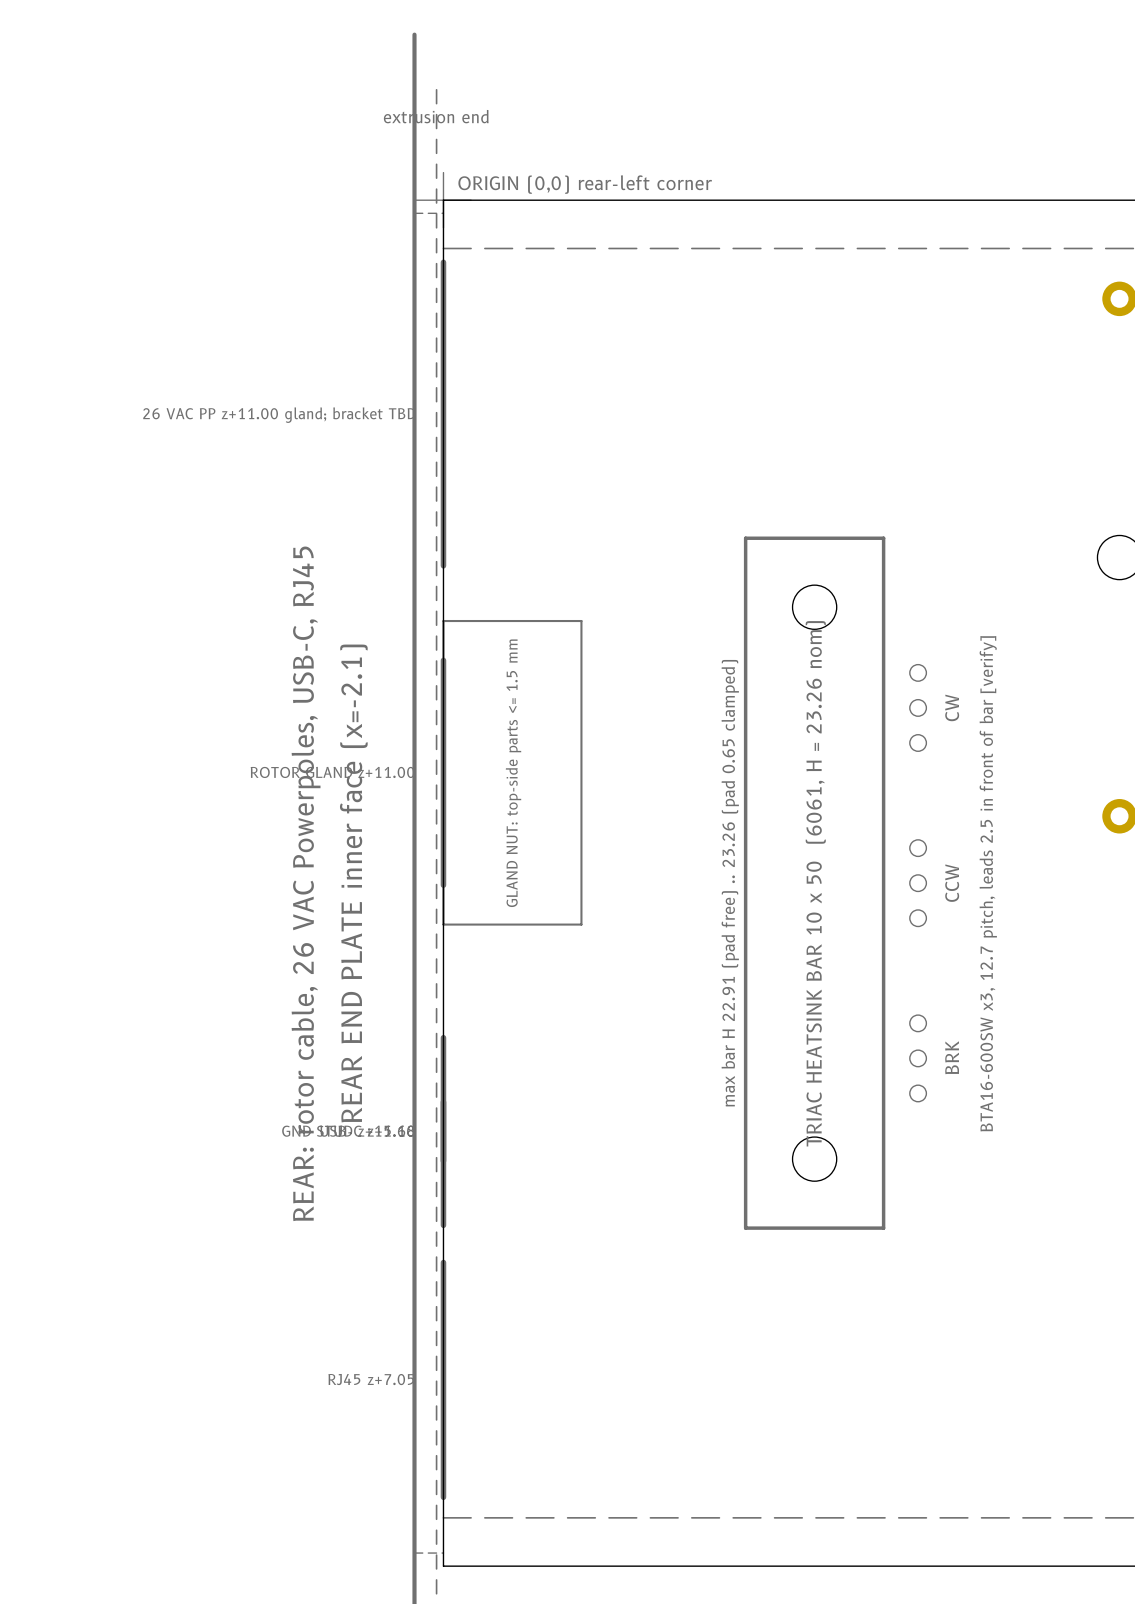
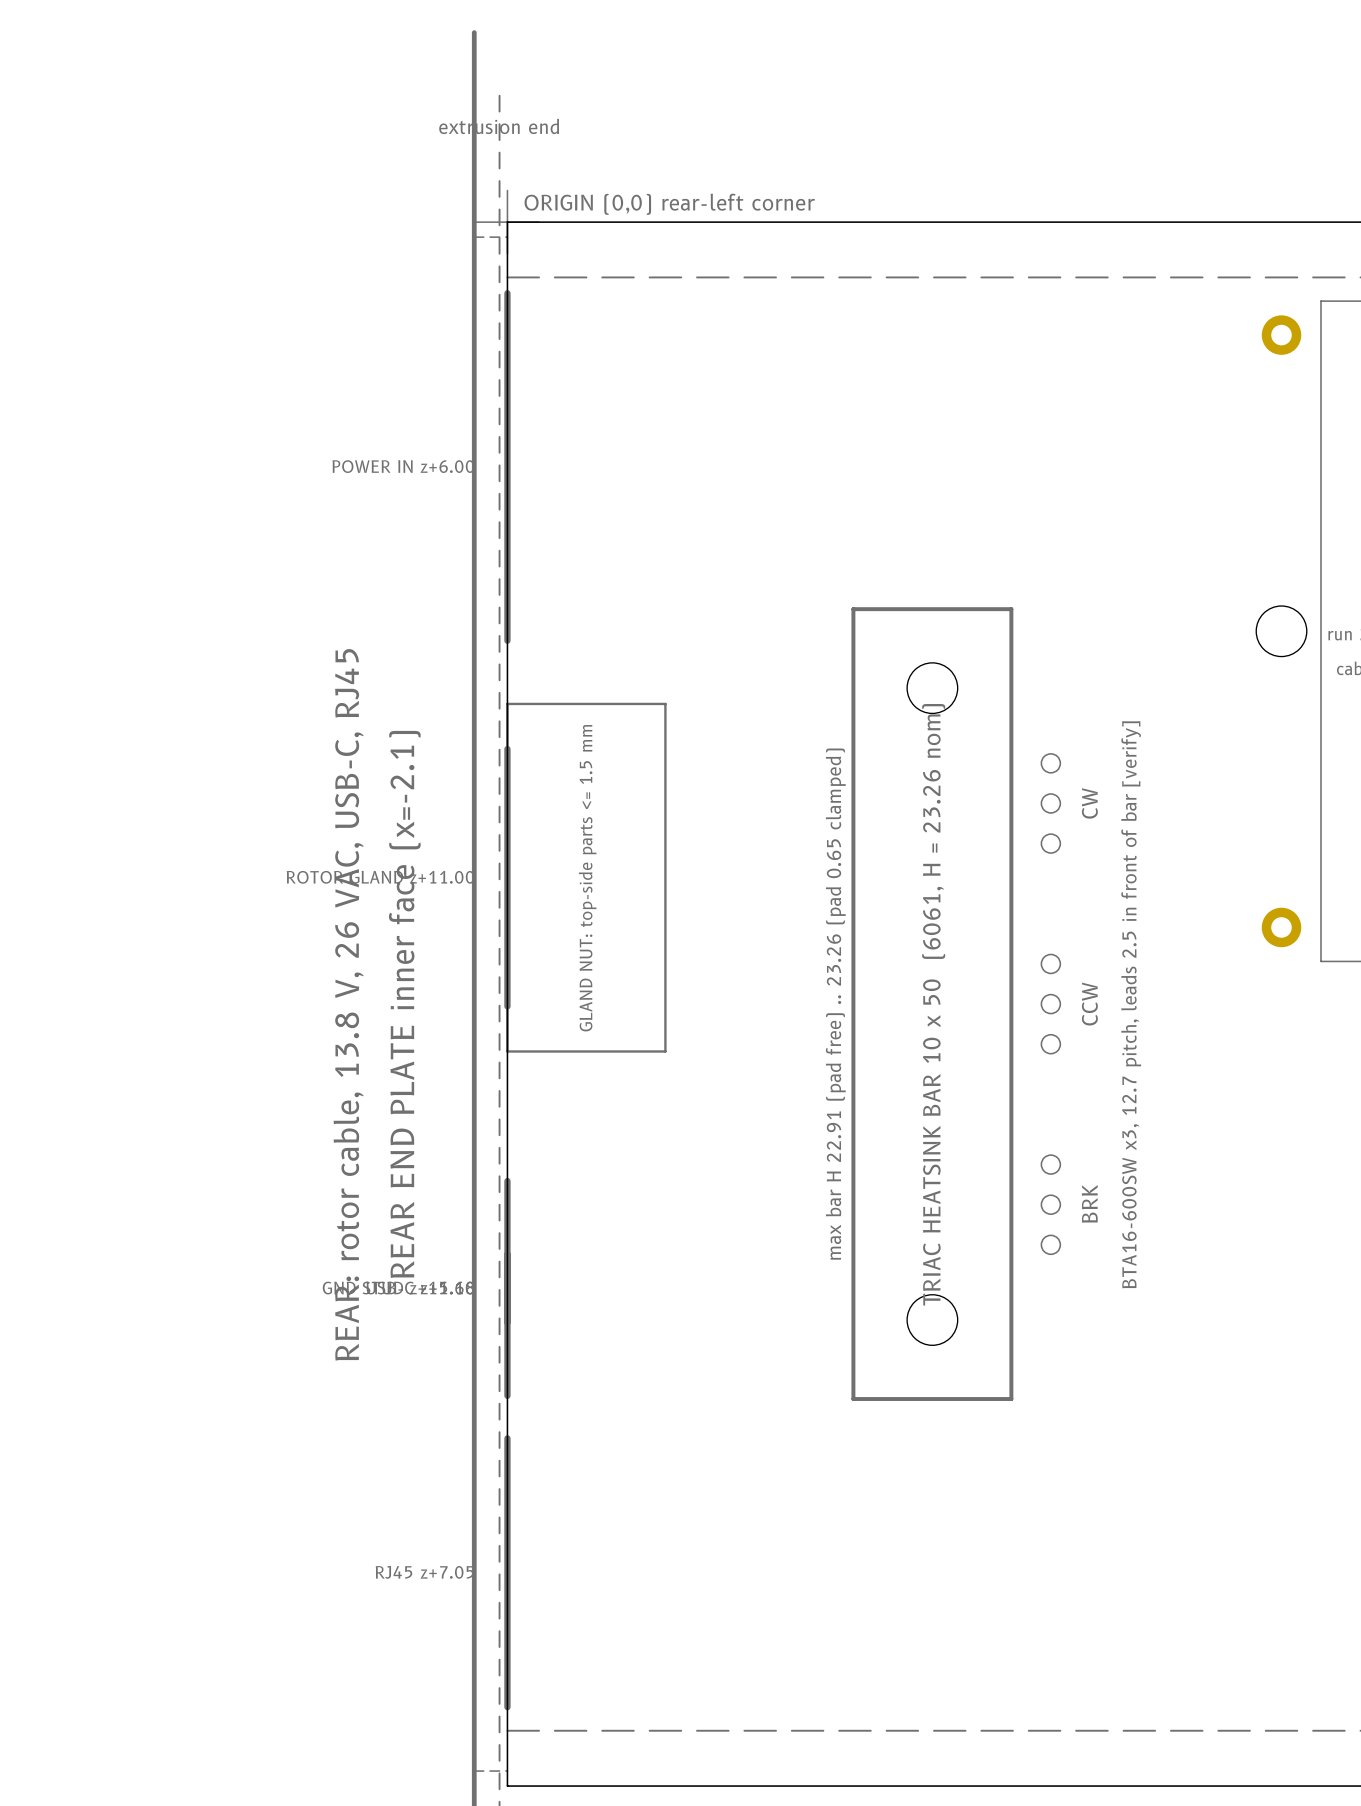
text: 26 VAC PP z+11.00 gland; bracket TBD (279, 415) -> POWER IN z+6.00 (403, 466)
text: REAR: rotor cable, 26 VAC Powerpoles, USB-C, RJ45 (306, 883) -> REAR: rotor cable, 13.8 V, 26 VAC, USB-C, RJ45 (348, 1004)

